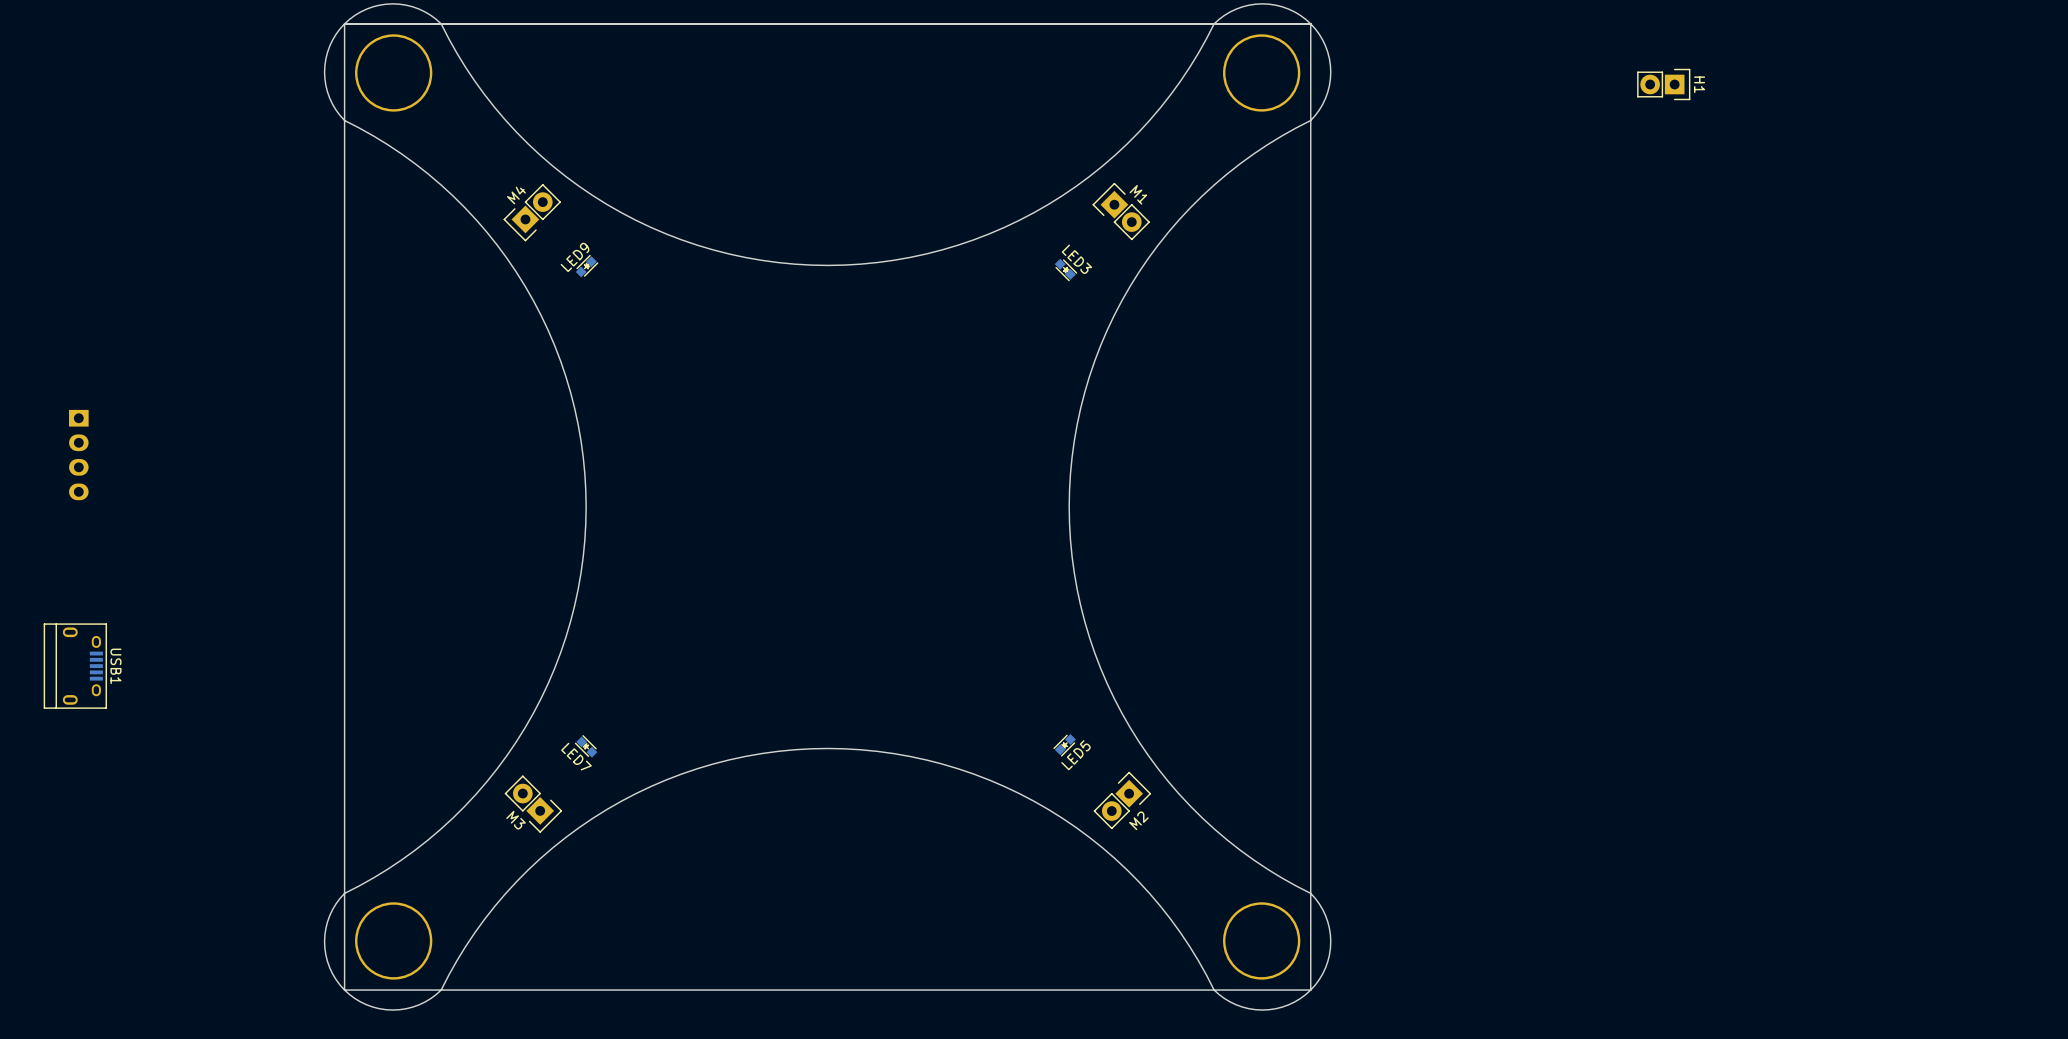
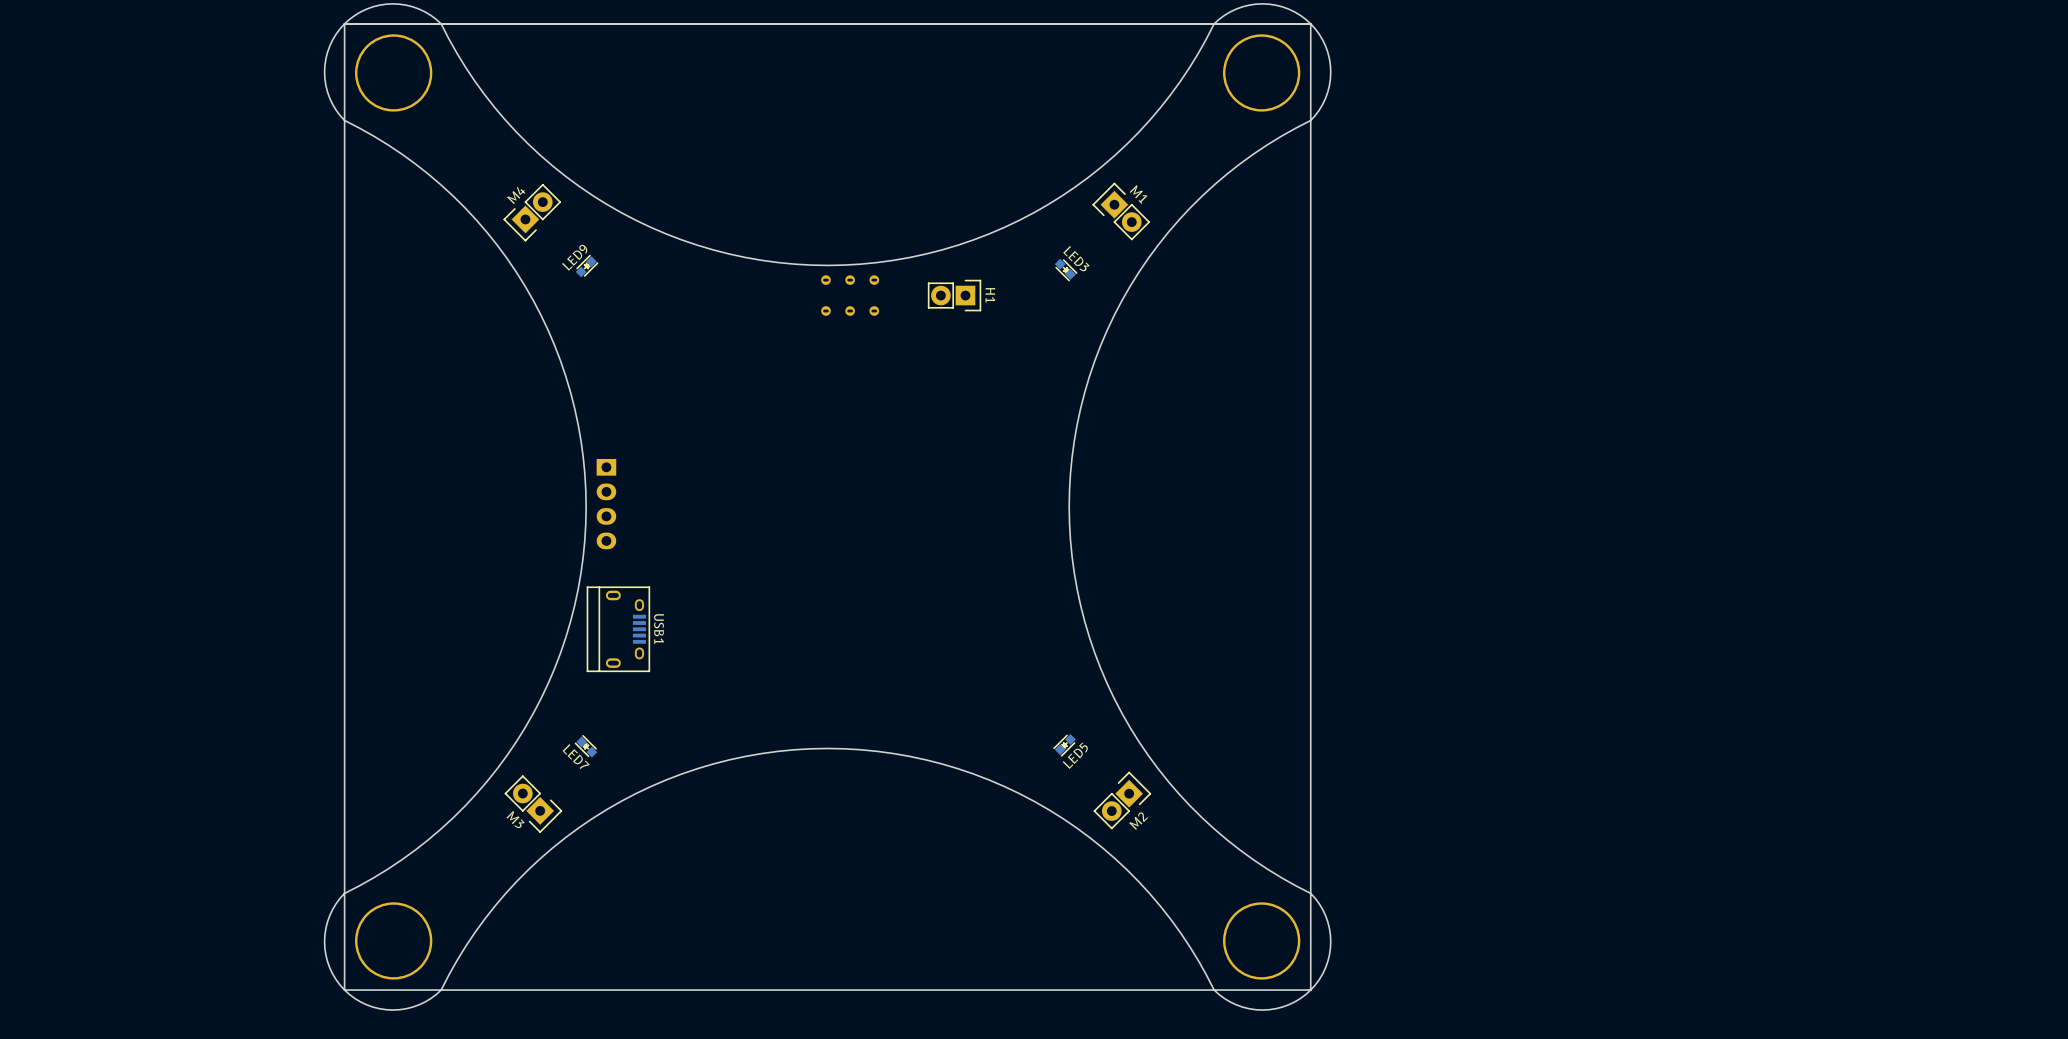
H1 position: (1663, 84) -> (954, 295)
part: none -> (850, 295)
part: (78, 455) -> none
part: none -> (606, 504)
USB1 position: (75, 666) -> (618, 629)

